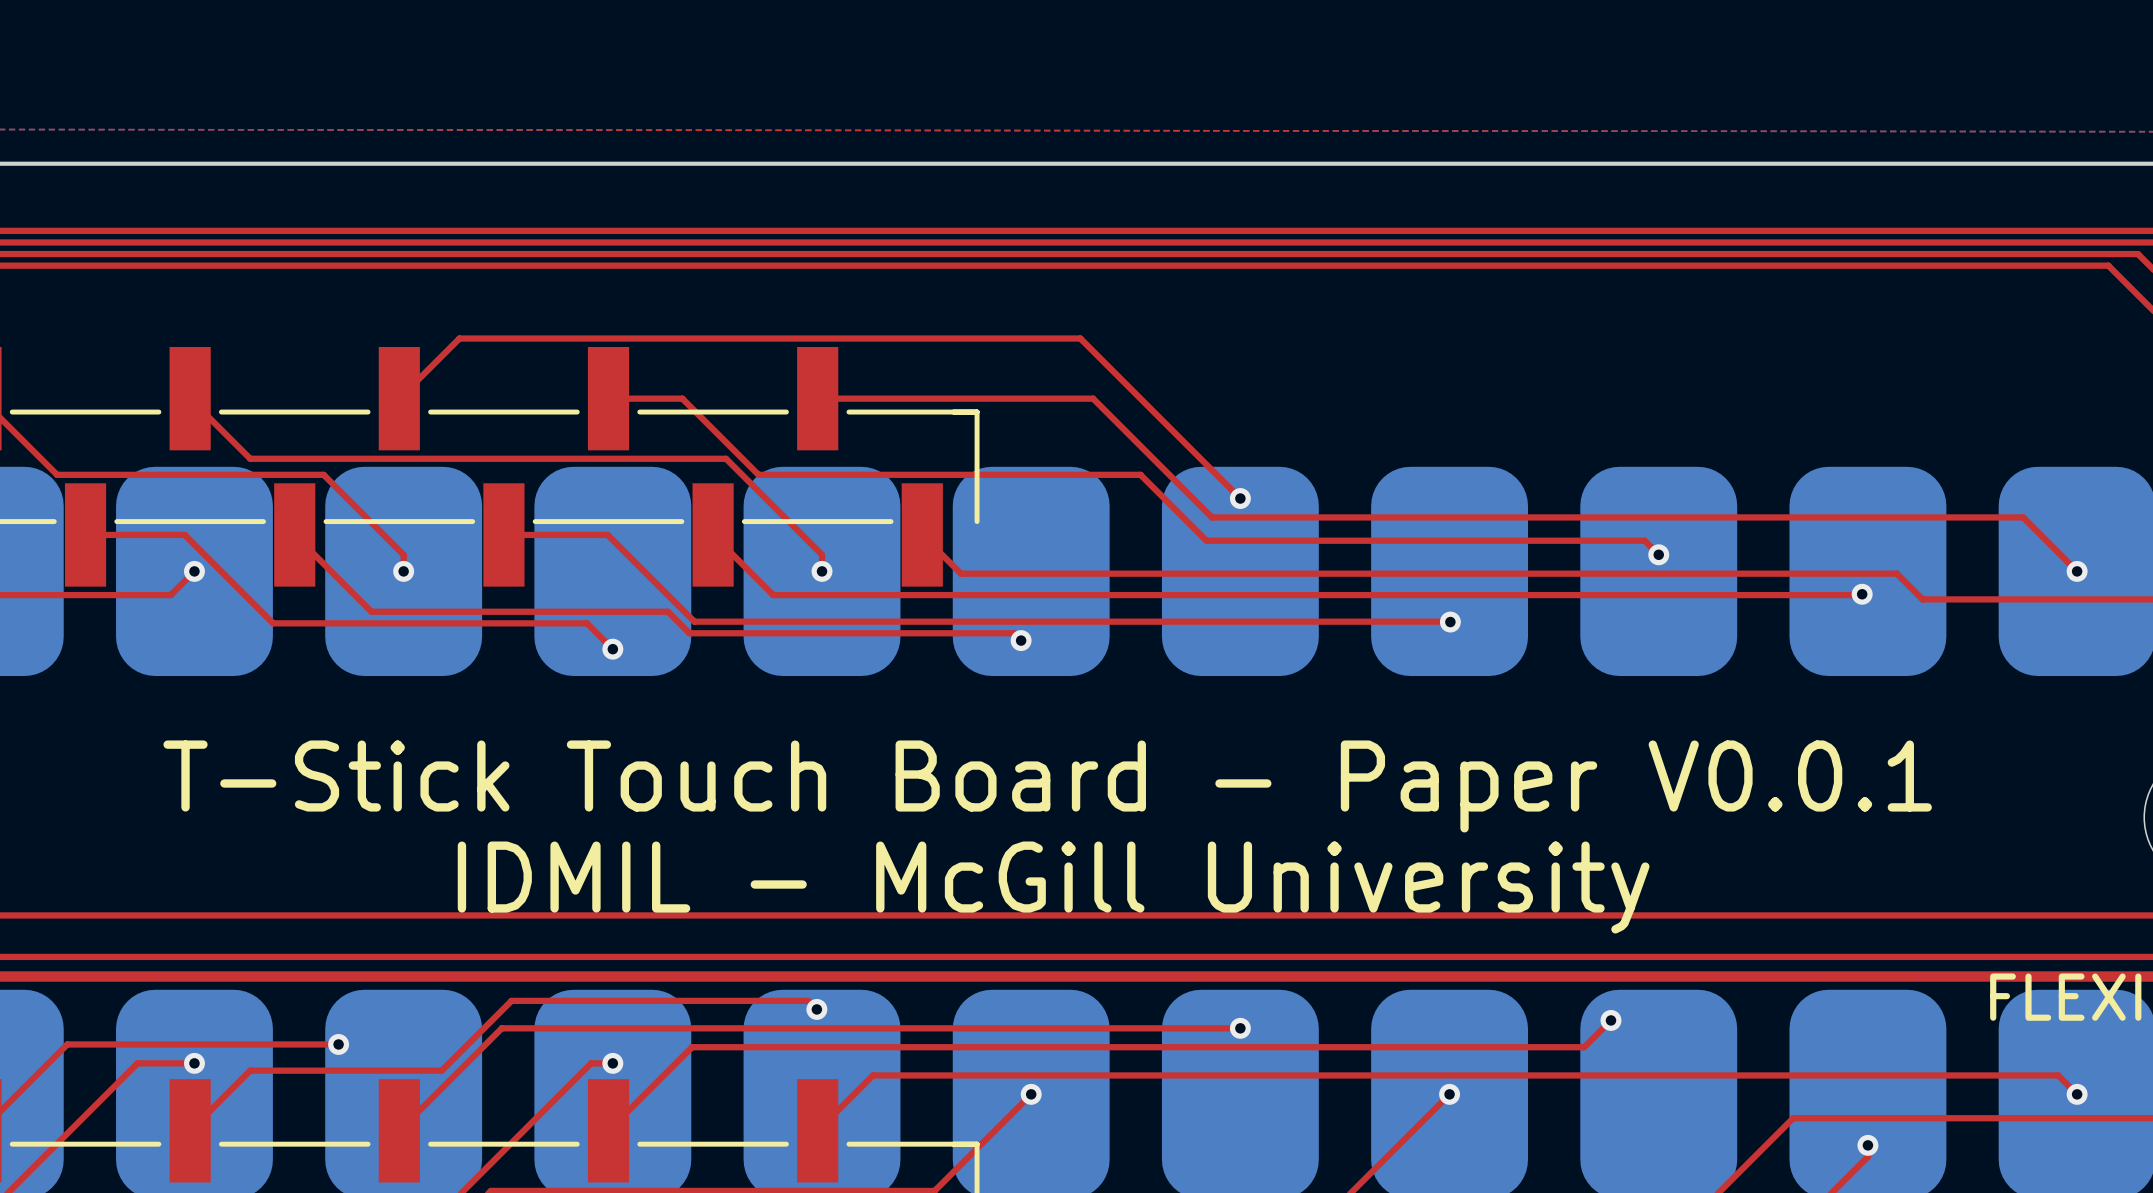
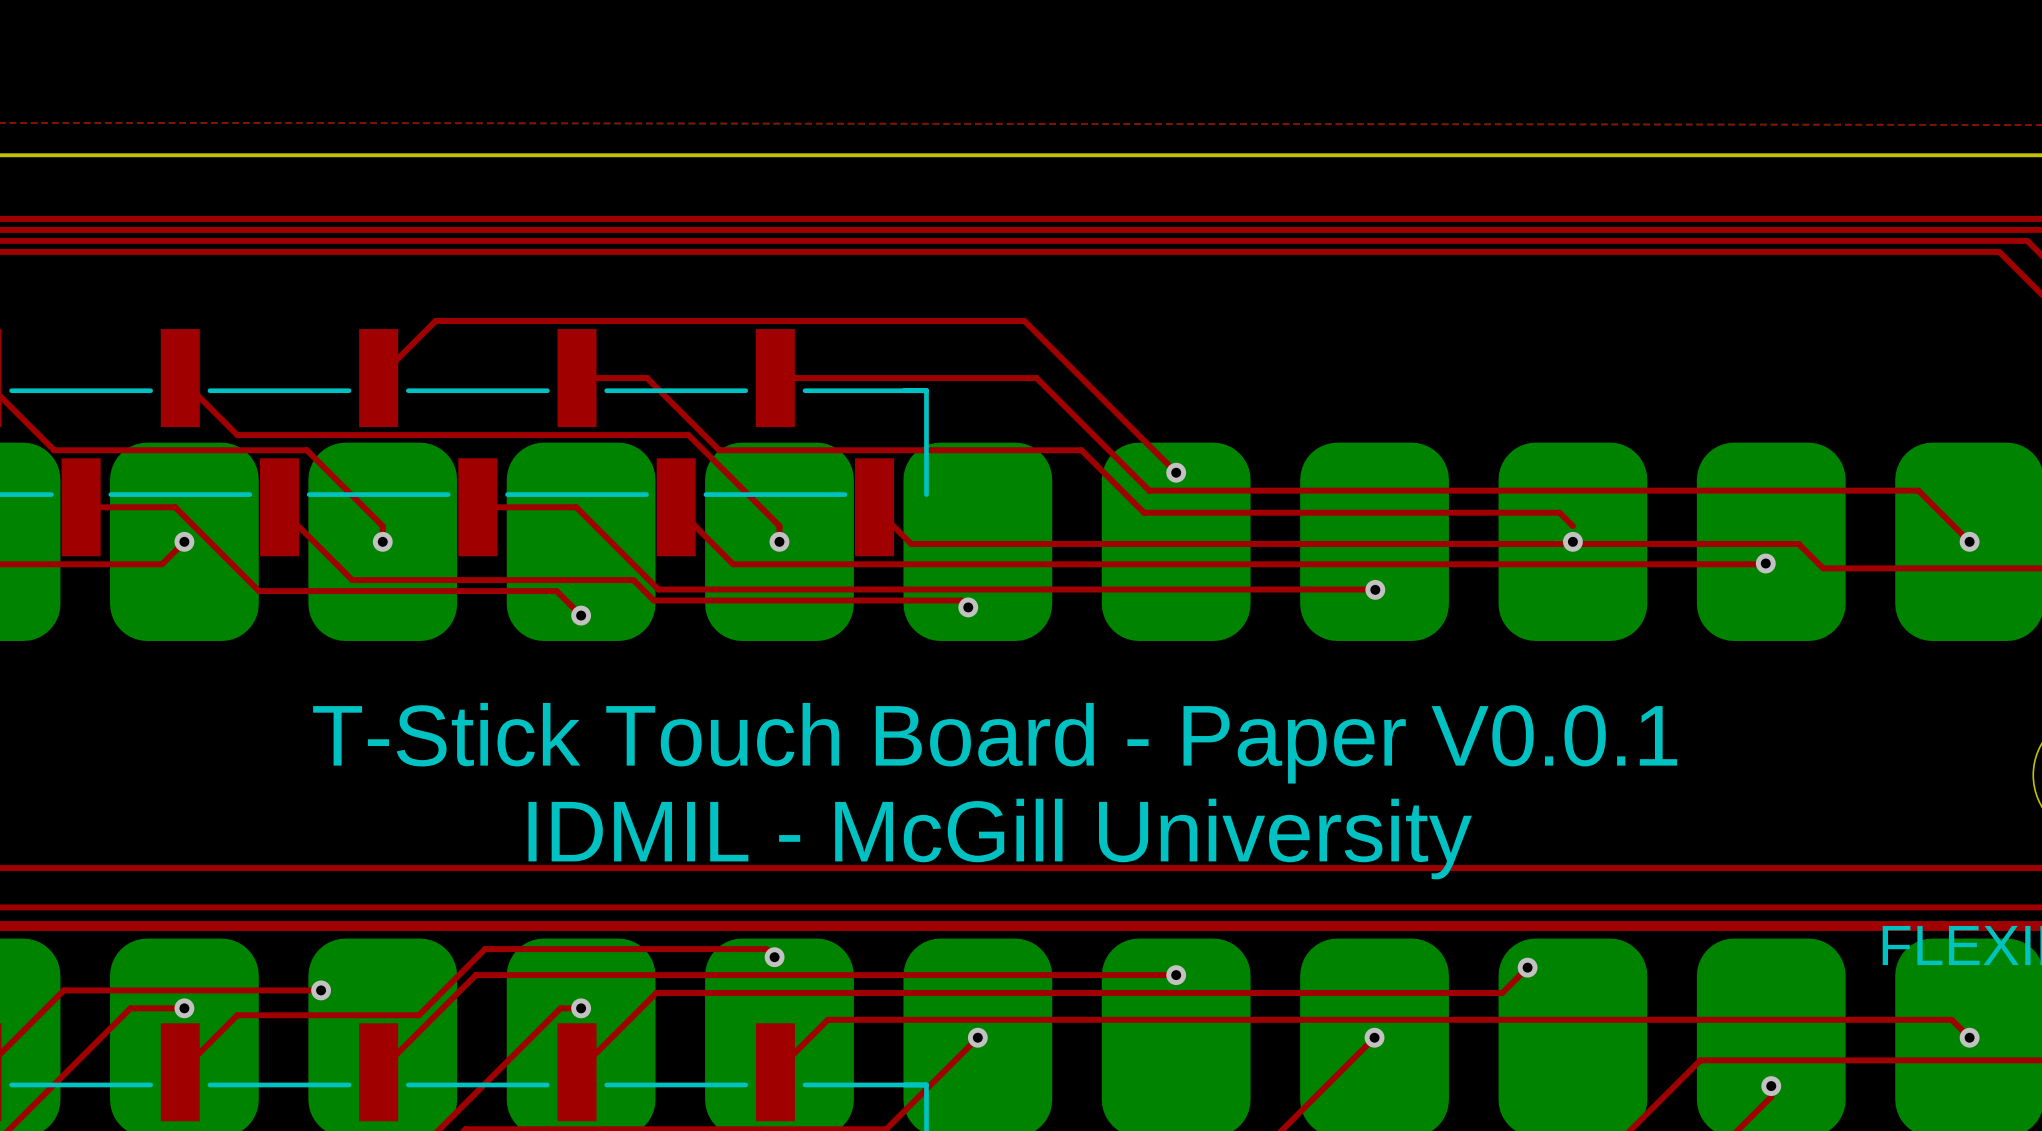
via position: (1658, 554) -> (1572, 541)

